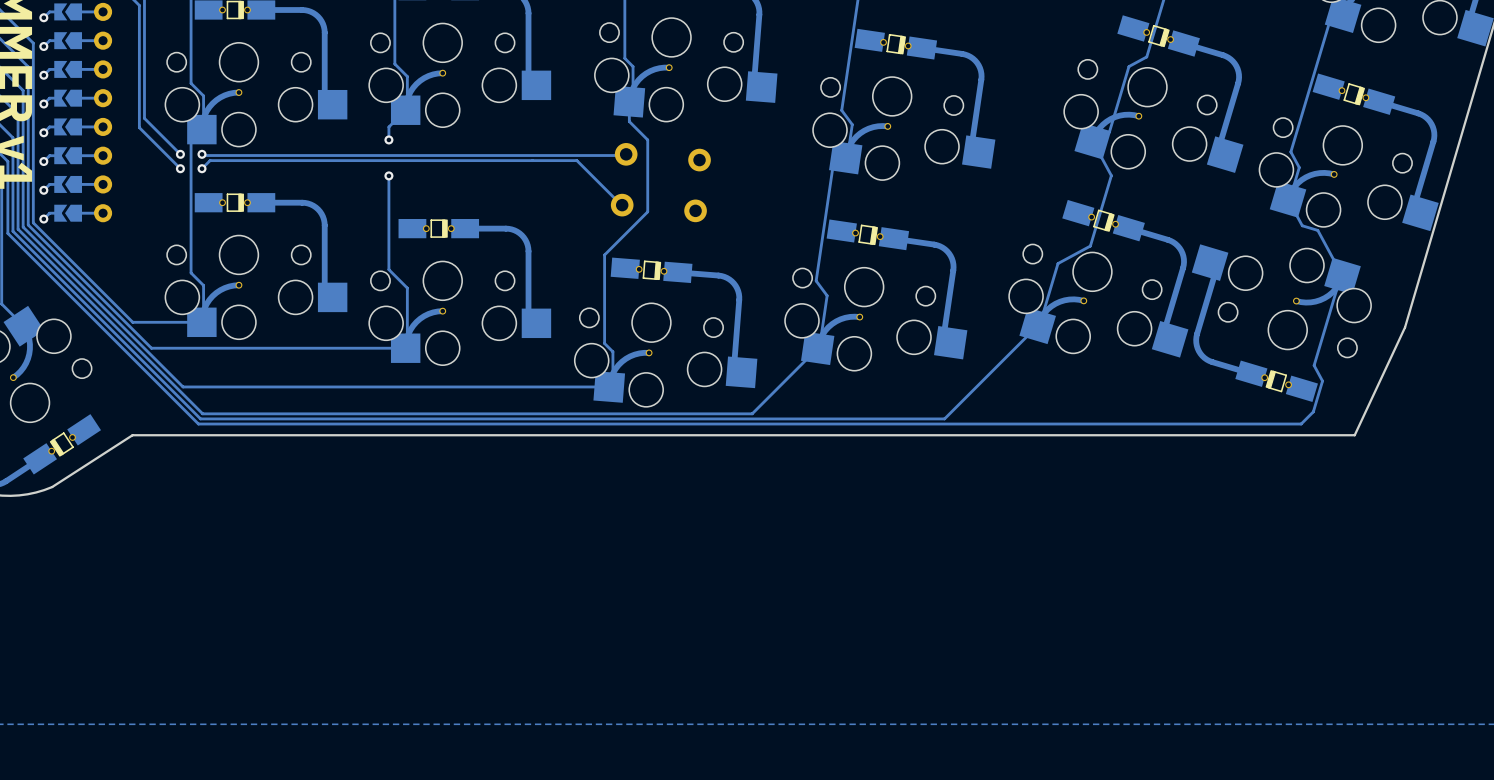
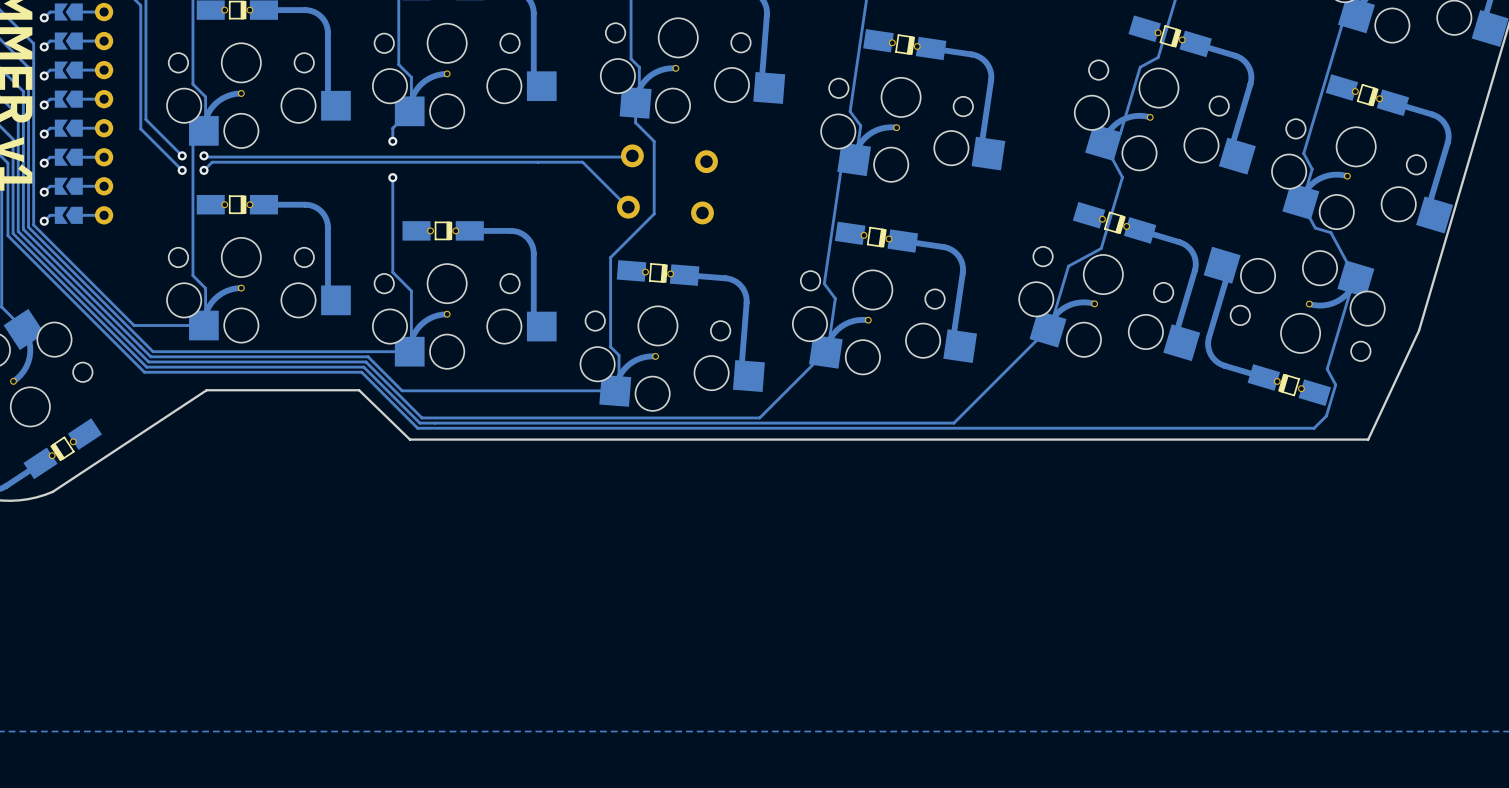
track: (149, 353) (183, 386) (398, 386) -> (150, 356) (368, 356) (402, 390)
track: (147, 358) (202, 413) (417, 413) -> (148, 361) (365, 361) (421, 417)
track: (145, 363) (200, 418) (415, 418) -> (146, 367) (363, 367) (419, 423)
track: (143, 368) (198, 424) (413, 424) -> (144, 372) (361, 372) (417, 428)
board edge: (405, 435) (132, 435) (52, 487) -> (409, 439) (359, 390) (206, 390) (52, 491)

